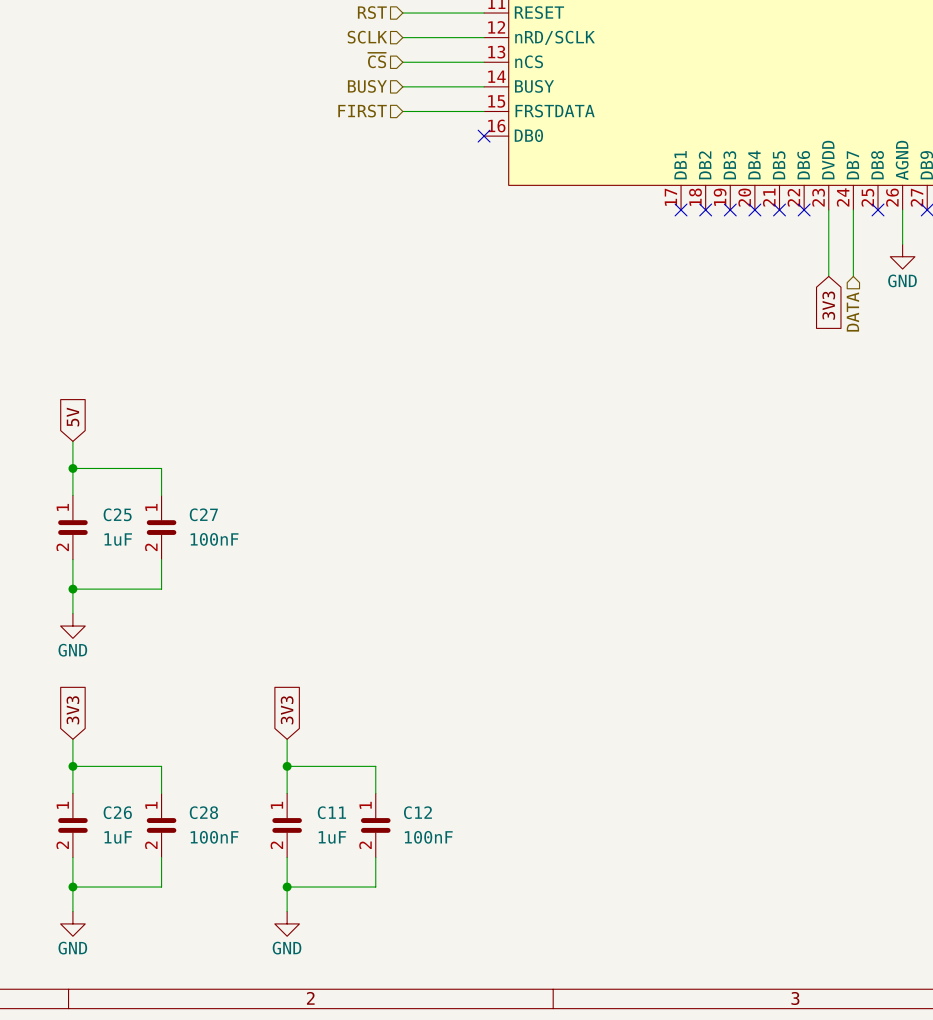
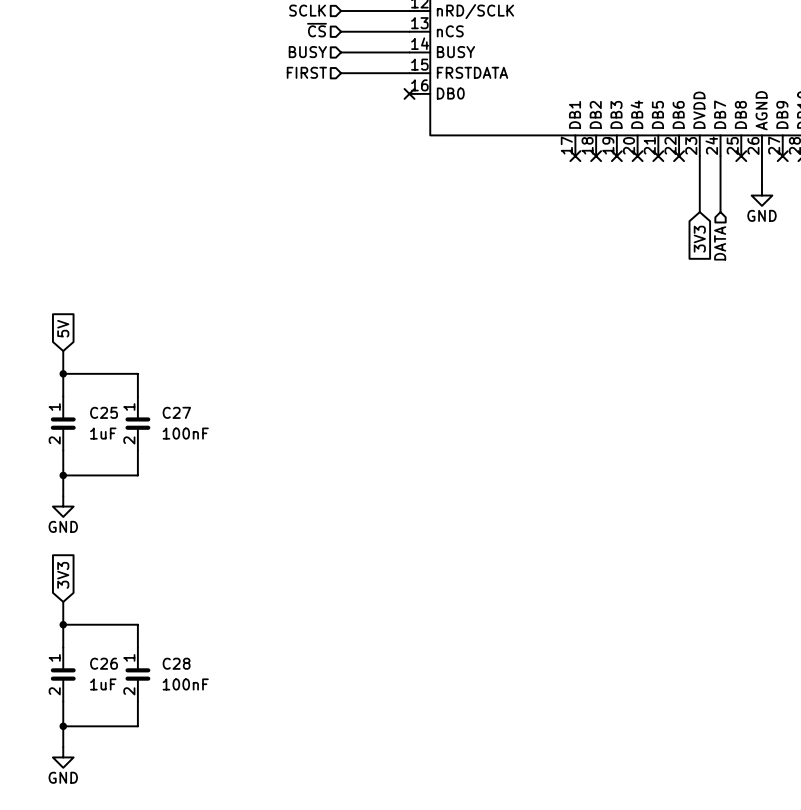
global label: 3V3 (287, 710) -> none
wire: (287, 739) (287, 793) -> none
wire: (287, 766) (375, 766) (375, 793) -> none
junction: (287, 766) -> none
C11: (287, 825) -> none
C12: (375, 825) -> none
wire: (287, 857) (287, 911) -> none
wire: (375, 857) (375, 887) (287, 887) -> none
junction: (287, 887) -> none
power symbol: GND (287, 923) -> none

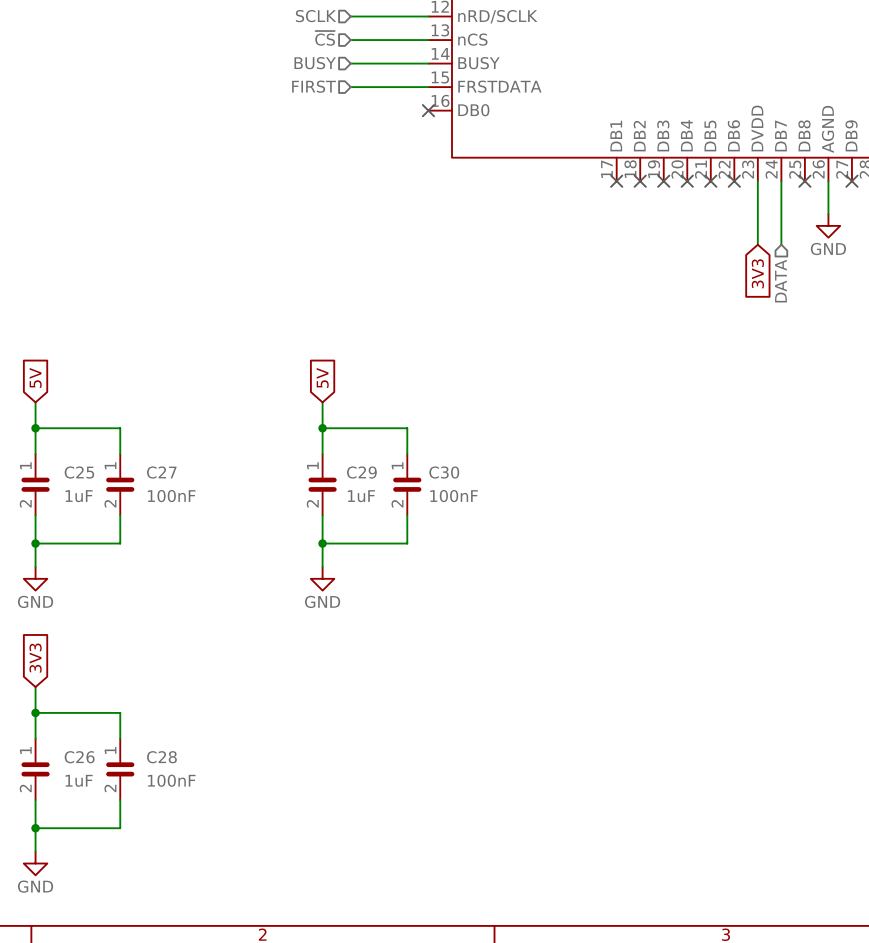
global label: none -> 5V (322, 377)
wire: none -> (322, 402) (322, 454)
wire: none -> (322, 428) (407, 428) (407, 454)
junction: none -> (322, 428)
C29: none -> (322, 484)
C30: none -> (407, 484)
wire: none -> (322, 515) (322, 567)
wire: none -> (407, 515) (407, 543) (322, 543)
junction: none -> (322, 543)
power symbol: none -> GND (322, 578)

